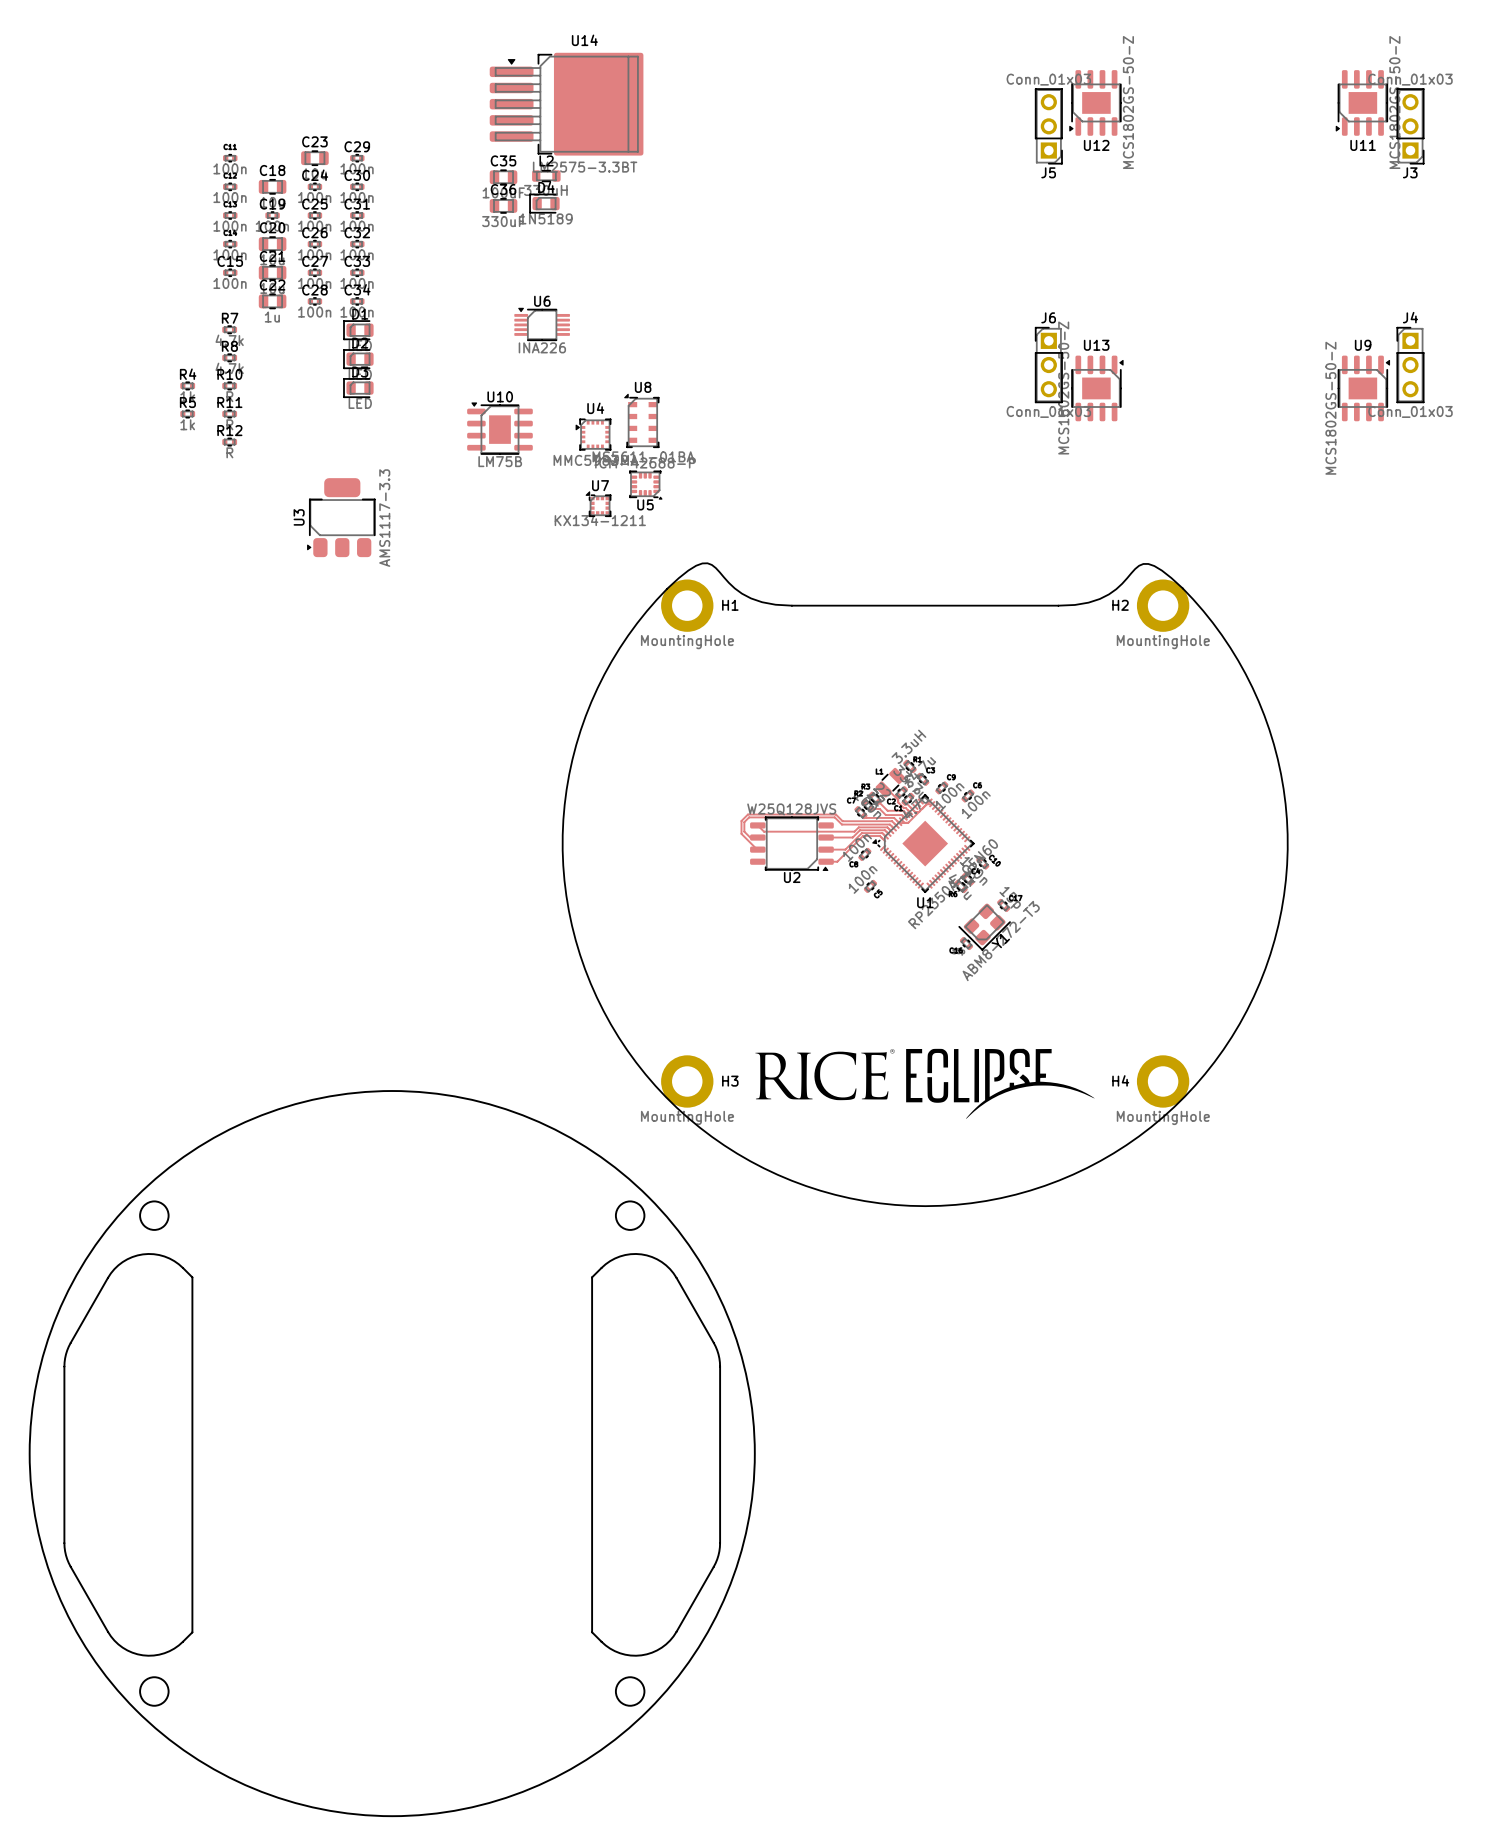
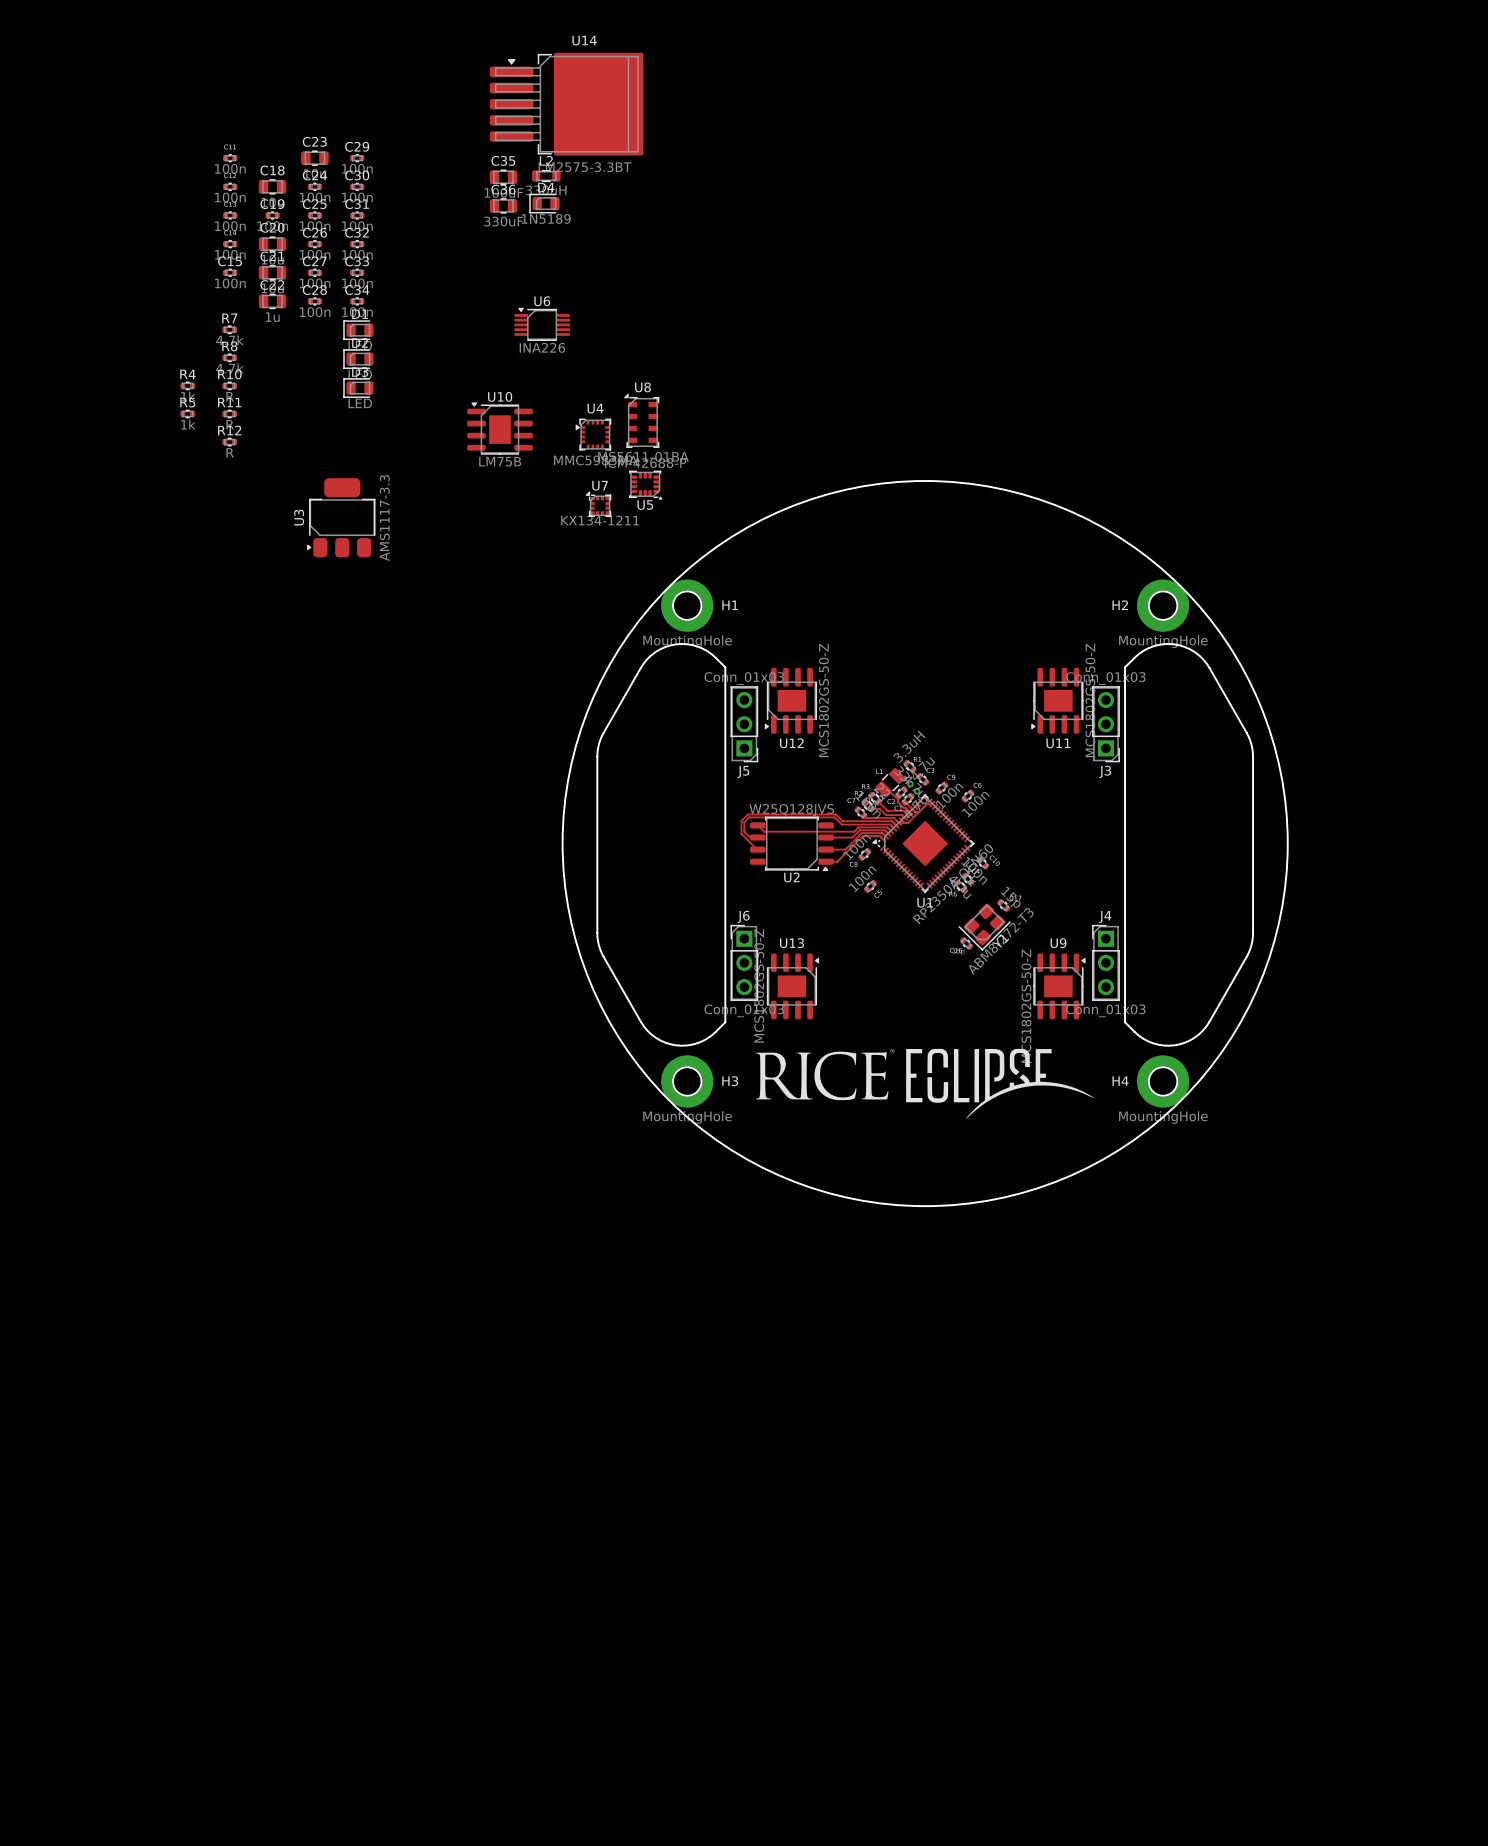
U12 position: (1095, 102) -> (790, 700)
U11 position: (1361, 102) -> (1057, 700)
J5 position: (1048, 126) -> (744, 724)
J3 position: (1410, 126) -> (1105, 724)
J6 position: (1048, 365) -> (744, 962)
J4 position: (1410, 365) -> (1105, 962)
U13 position: (1097, 388) -> (793, 986)
U9 position: (1364, 388) -> (1059, 986)
round board edge: none -> [561, 480, 1289, 1208]
board edge: (1182, 588) (1161, 570) (1154, 566) (1143, 563) (1135, 568) (1122, 583) (1108, 594) (1088, 602) (1074, 604) (791, 605) (775, 604) (751, 598) (734, 588) (715, 568) (707, 563) (696, 565) (688, 570) (667, 588) (637, 623) (619, 648) (597, 688) (585, 716) (572, 759) (566, 789) (562, 850) (568, 910) (580, 955) (590, 983) (603, 1011) (627, 1050) (665, 1097) (699, 1127) (724, 1145) (777, 1174) (820, 1190) (849, 1198) (910, 1205) (971, 1203) (1015, 1194) (1044, 1185) (1073, 1174) (1113, 1153) (1138, 1136) (1174, 1107) (1195, 1085) (1223, 1049) (1239, 1023) (1259, 982) (1278, 925) (1284, 895) (1287, 849) (1286, 819) (1281, 774) (1269, 729) (1258, 701) (1230, 647) (1203, 610) (1182, 588) -> none
round board edge: none -> [672, 590, 703, 621]
round board edge: none -> [1147, 590, 1179, 621]
board edge: none -> (715, 657) (725, 667) (725, 1022) (702, 1041) (692, 1044) (675, 1045) (655, 1037) (643, 1026) (598, 945) (597, 933) (597, 752) (603, 732) (640, 667) (651, 655) (665, 647) (686, 644) (702, 648) (715, 657)
board edge: none -> (1134, 657) (1125, 667) (1125, 1022) (1147, 1041) (1163, 1045) (1174, 1045) (1194, 1037) (1206, 1026) (1251, 945) (1253, 933) (1252, 752) (1246, 732) (1209, 667) (1199, 655) (1185, 647) (1169, 643) (1147, 648) (1134, 657)
round board edge: none -> [1147, 1066, 1179, 1097]
round board edge: [28, 1090, 756, 1818] -> none
round board edge: [139, 1200, 170, 1231] -> none
round board edge position: (630, 1215) -> (687, 1081)
board edge: (182, 1267) (192, 1277) (192, 1632) (169, 1651) (153, 1655) (142, 1655) (122, 1647) (110, 1636) (66, 1555) (64, 1543) (64, 1362) (70, 1342) (107, 1277) (118, 1265) (132, 1257) (153, 1254) (169, 1258) (182, 1267) -> none
board edge: (601, 1267) (592, 1277) (592, 1632) (614, 1651) (630, 1655) (641, 1655) (657, 1650) (673, 1636) (718, 1555) (720, 1543) (719, 1362) (713, 1342) (676, 1277) (666, 1265) (652, 1257) (636, 1253) (614, 1258) (601, 1267) -> none
round board edge: [139, 1676, 170, 1707] -> none
round board edge: [614, 1676, 646, 1707] -> none

